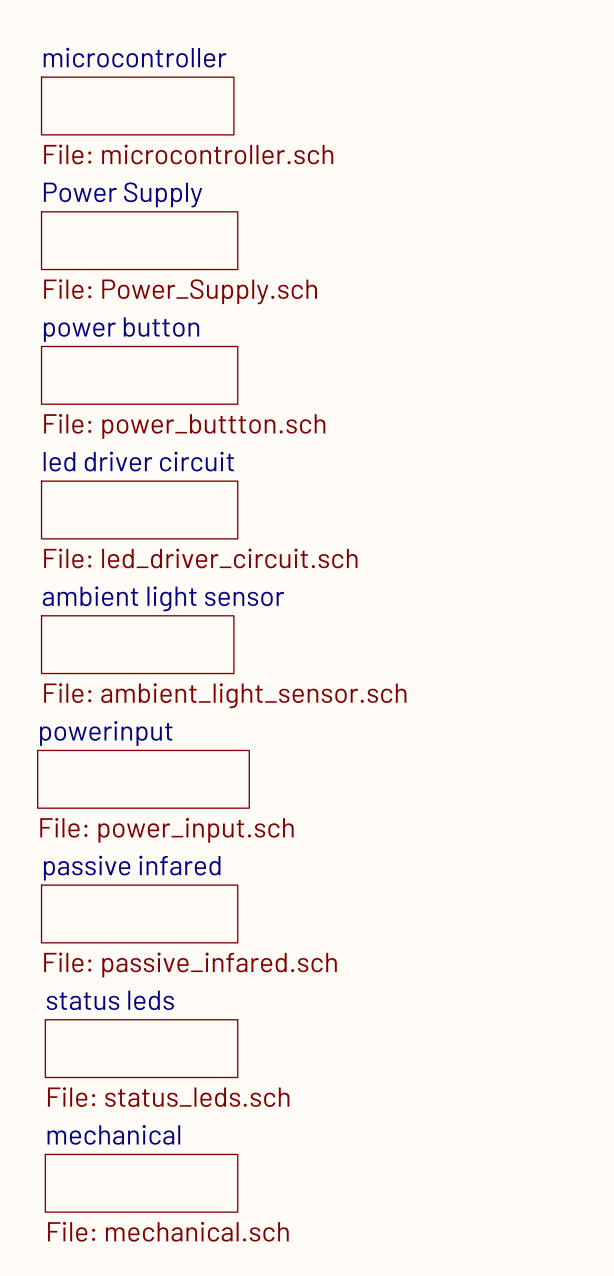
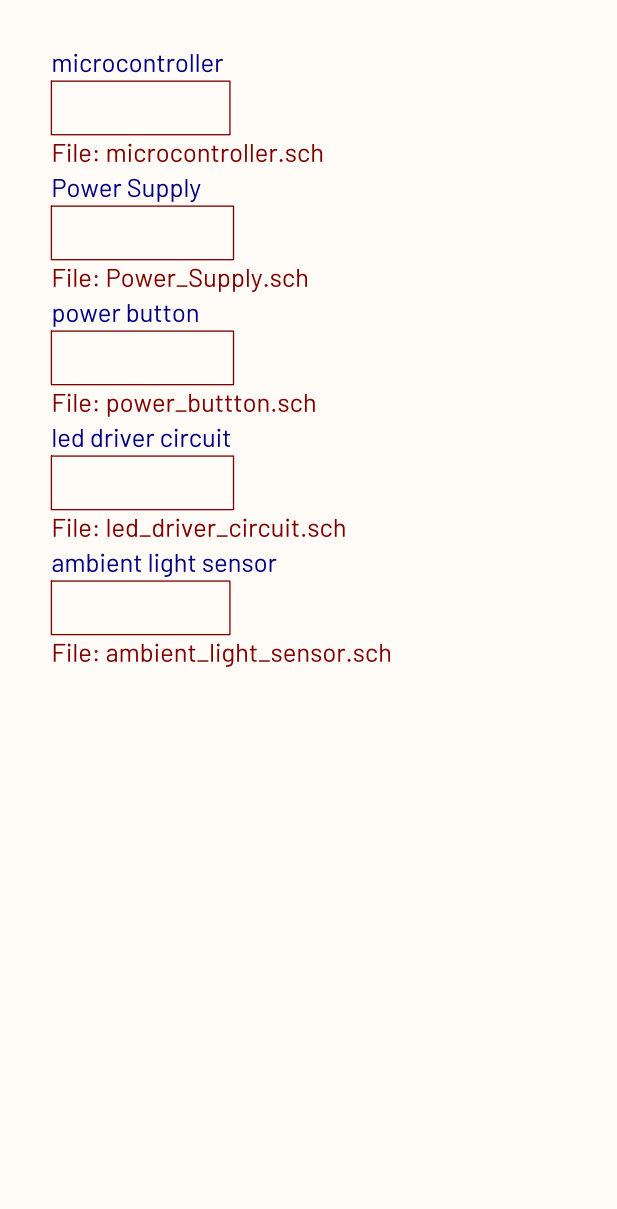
sheet powerinput: File: power_input.sch (143, 779) -> none
sheet passive infared: File: passive_infared.sch (139, 913) -> none
sheet status leds: File: status_leds.sch (141, 1048) -> none
sheet mechanical: File: mechanical.sch (141, 1183) -> none

